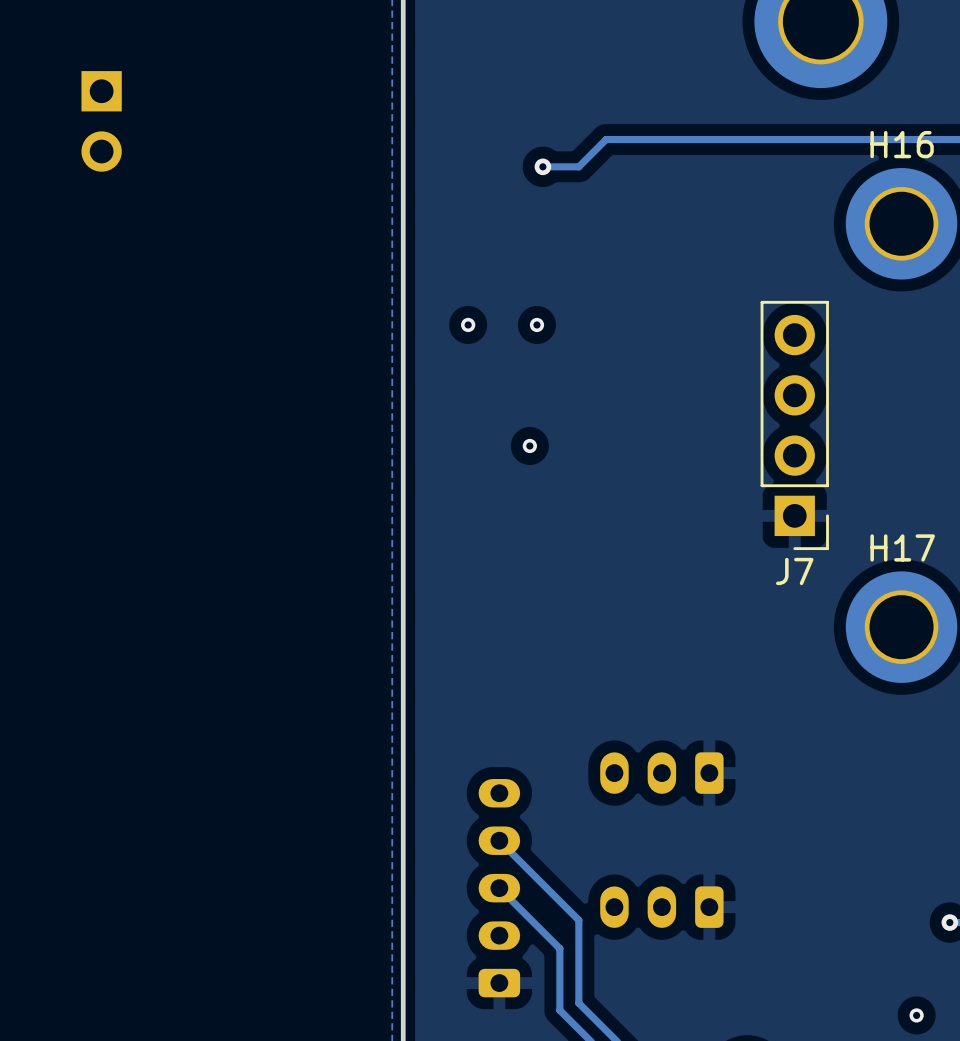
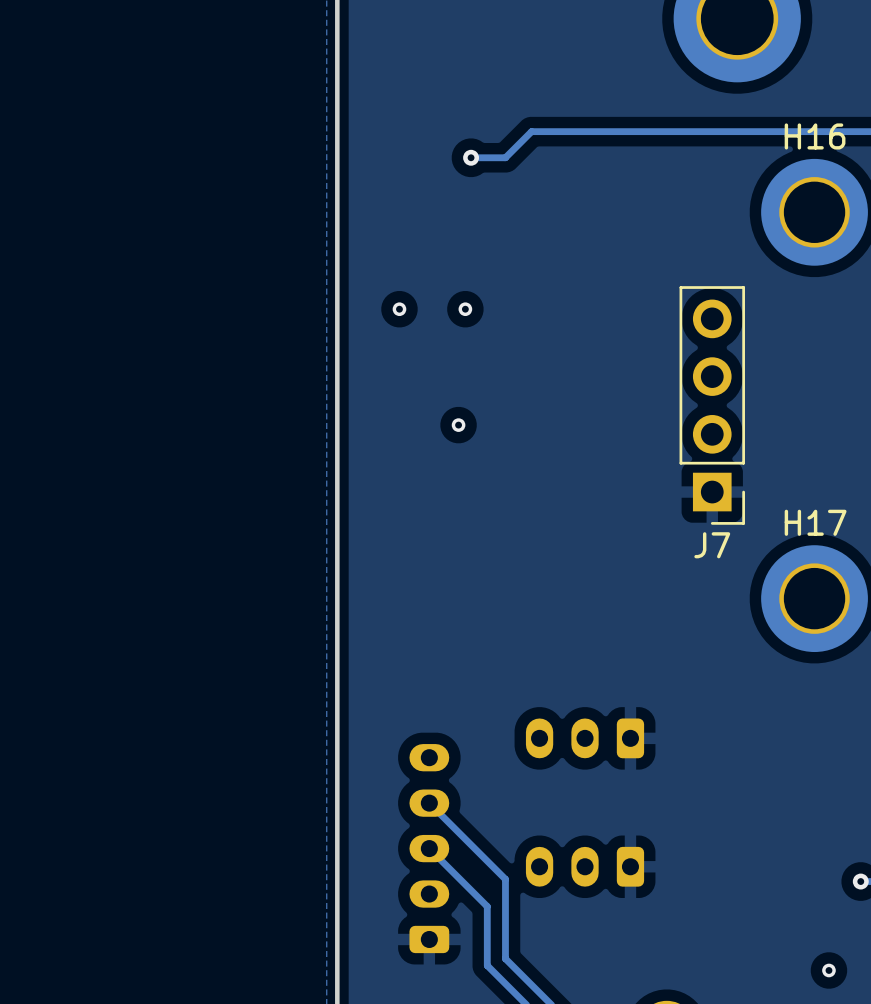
part: (101, 121) -> none

